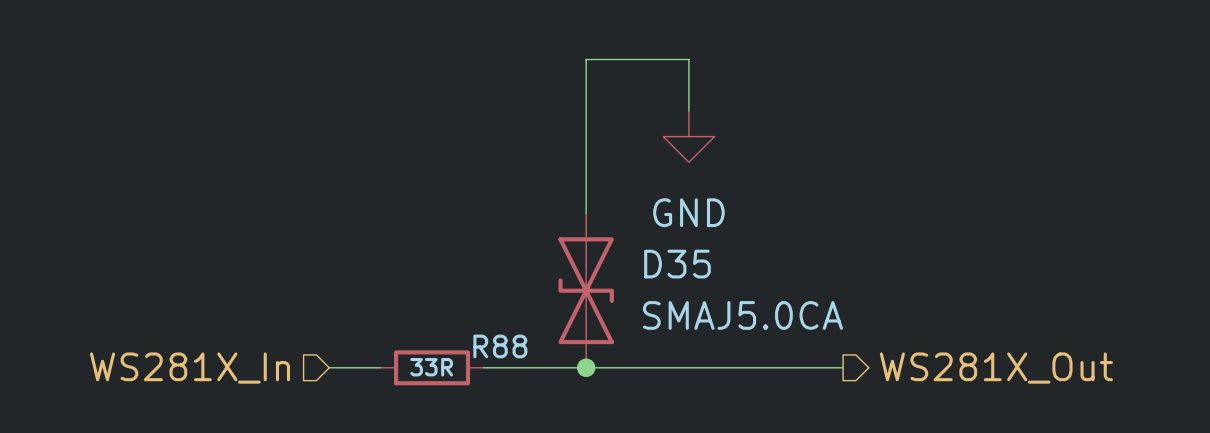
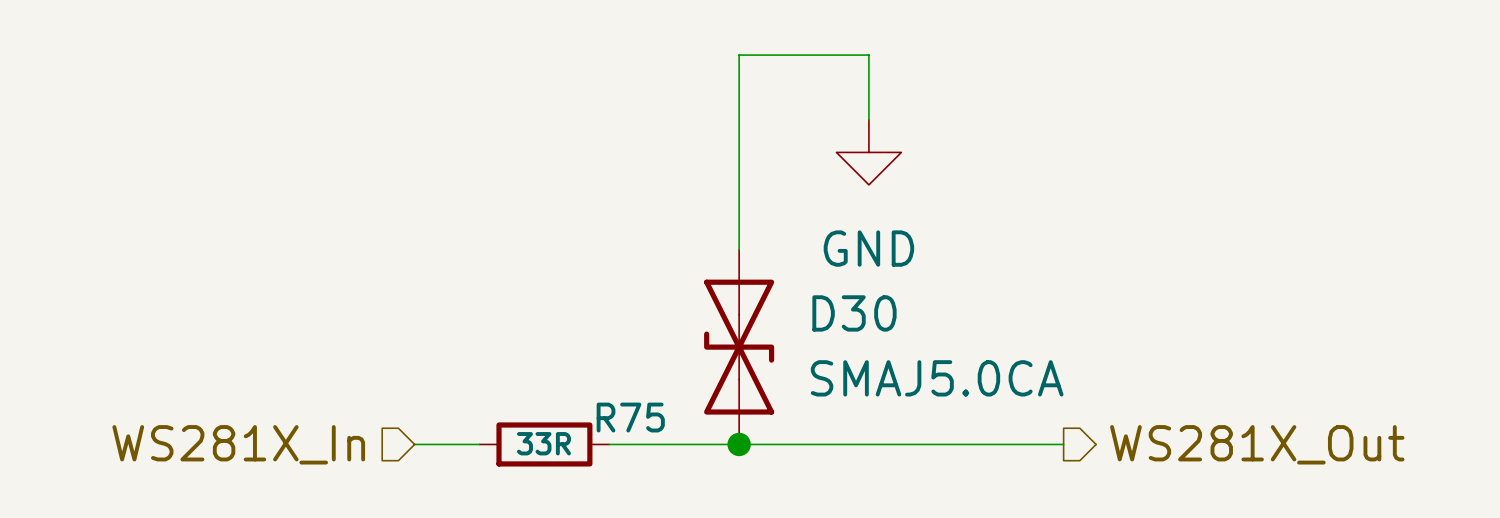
D35 name: D35 (677, 264) -> D30 (854, 313)
R88 name: R88 (500, 346) -> R75 (630, 417)

